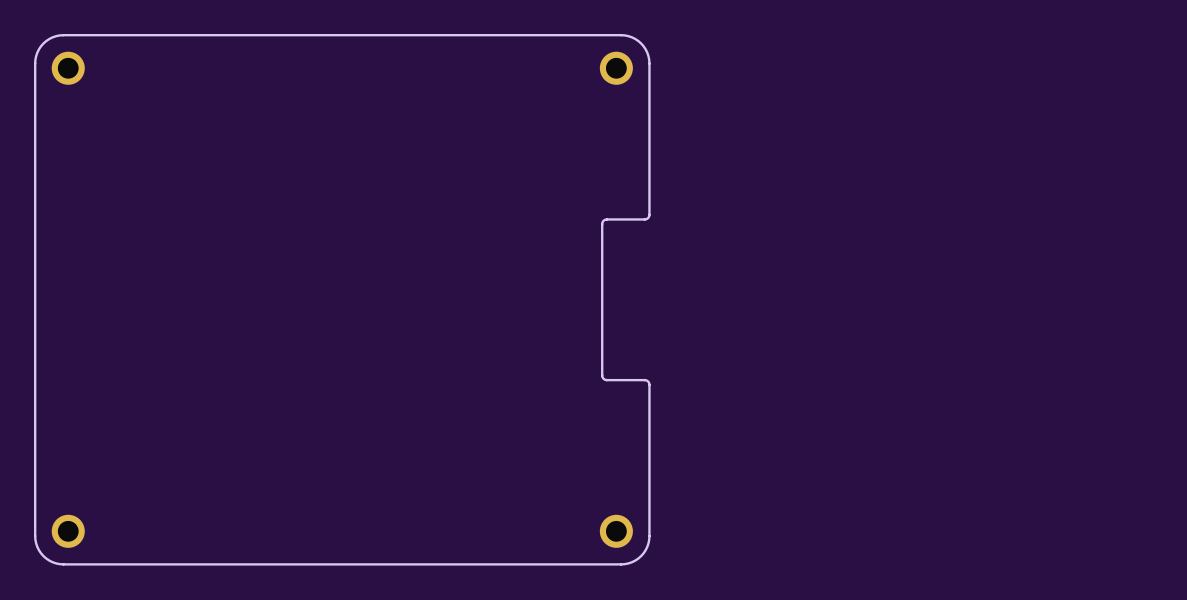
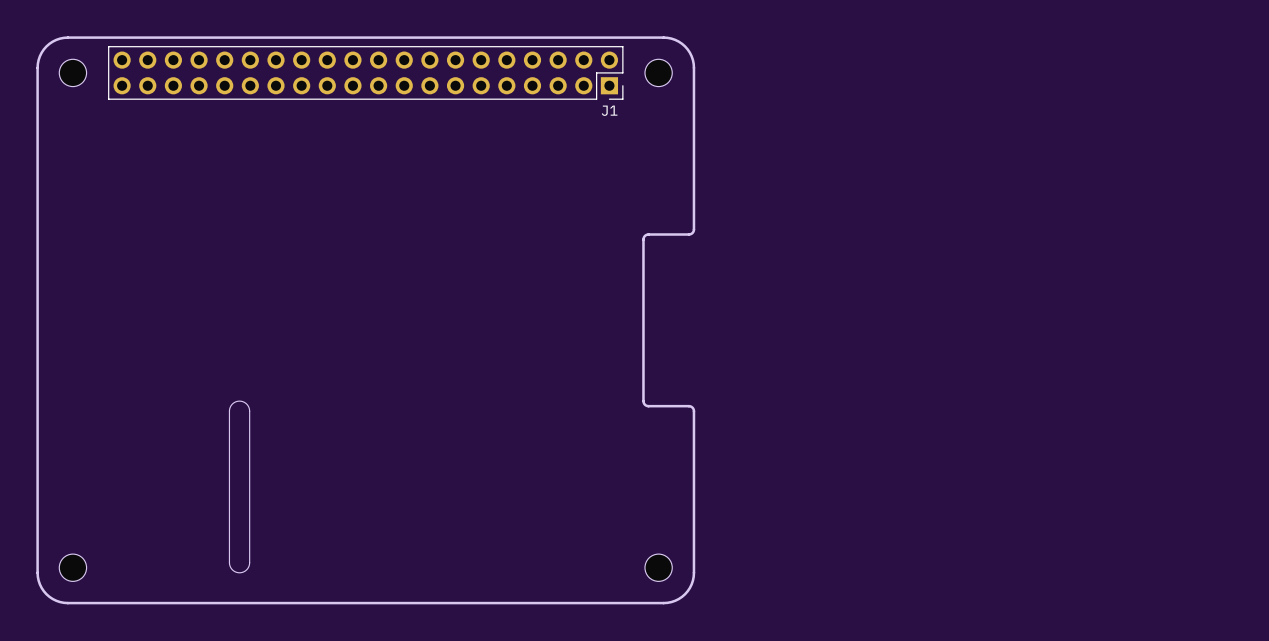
part footprint: [51, 51, 85, 85] -> [59, 59, 87, 87]
part footprint: [599, 51, 633, 85] -> [644, 59, 673, 87]
J1: none -> (365, 72)
board edge: none -> (249, 411) (249, 564) (245, 570) (238, 572) (231, 568) (229, 562) (229, 409) (232, 404) (239, 401) (246, 404) (249, 411)
part footprint: [51, 514, 85, 548] -> [59, 554, 87, 582]
part footprint: [599, 514, 633, 548] -> [644, 554, 673, 582]

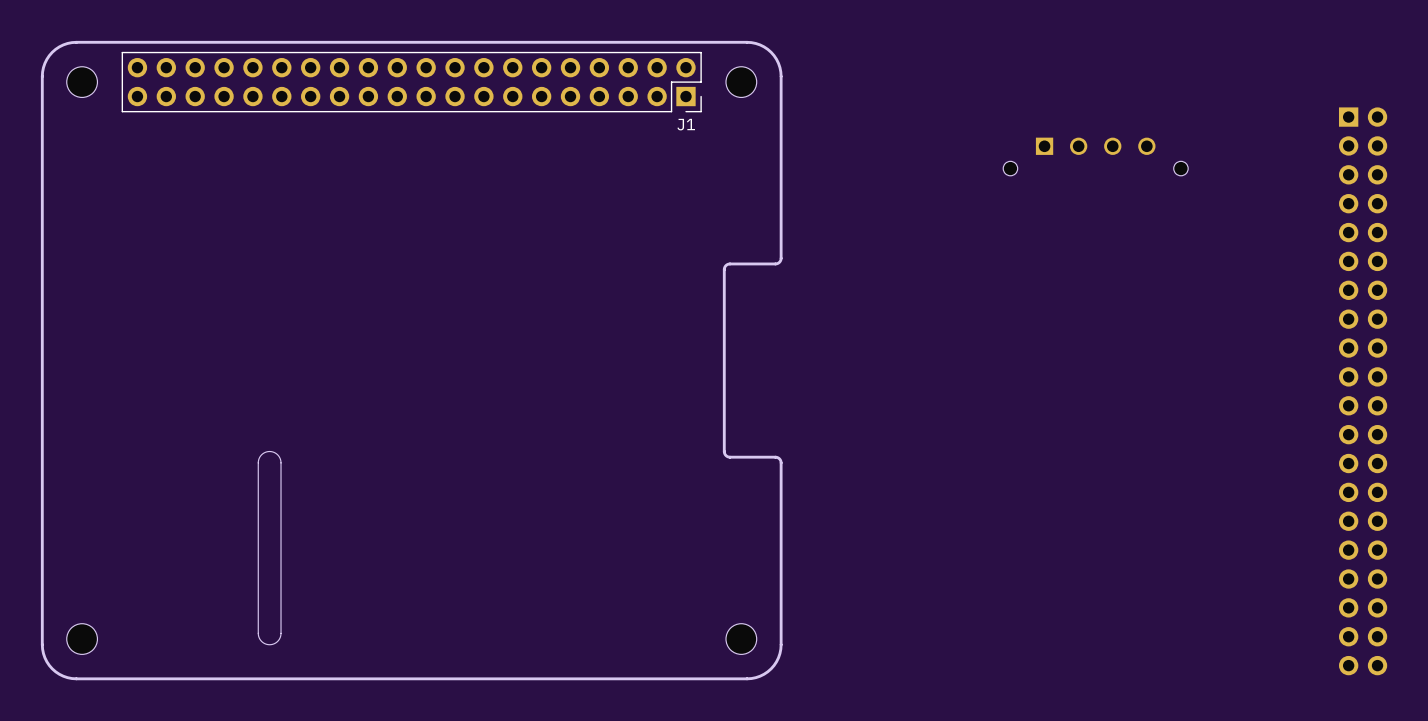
part: none -> (1095, 156)
part: none -> (1363, 391)

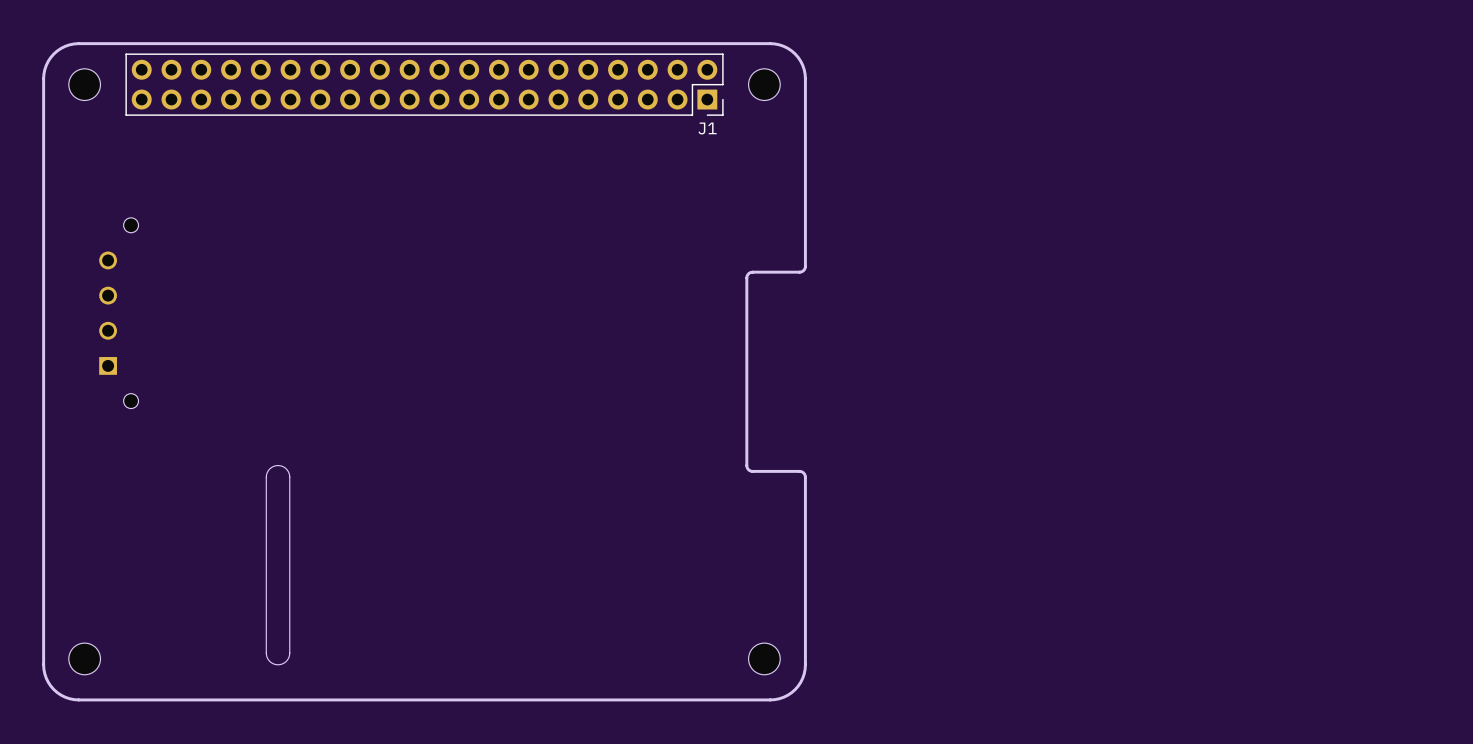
part: (1095, 156) -> none
part: none -> (118, 313)
part: (1363, 391) -> none

